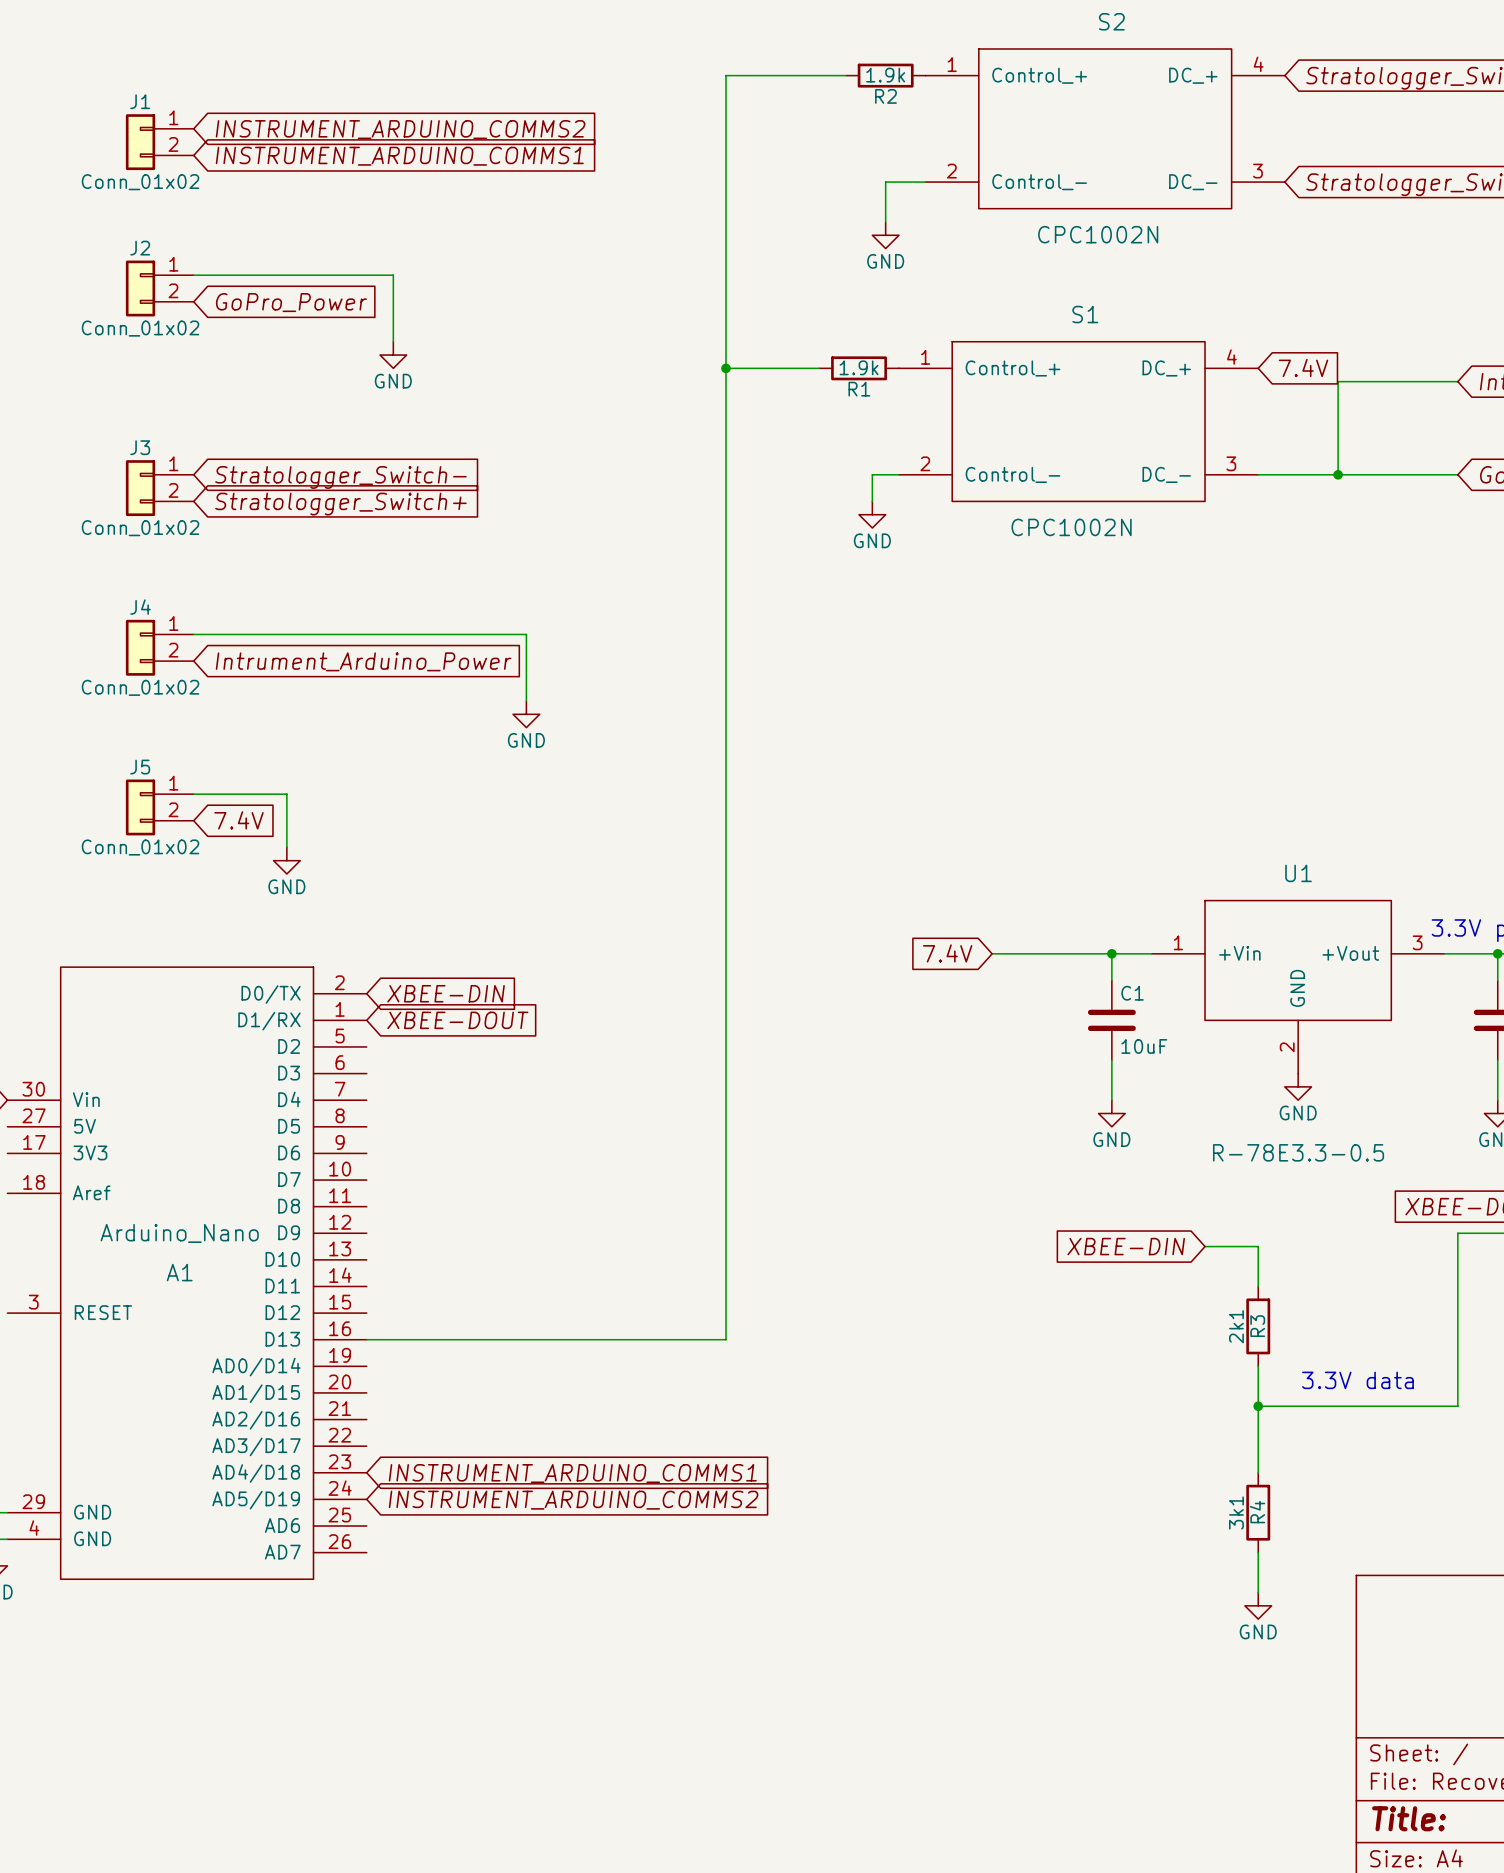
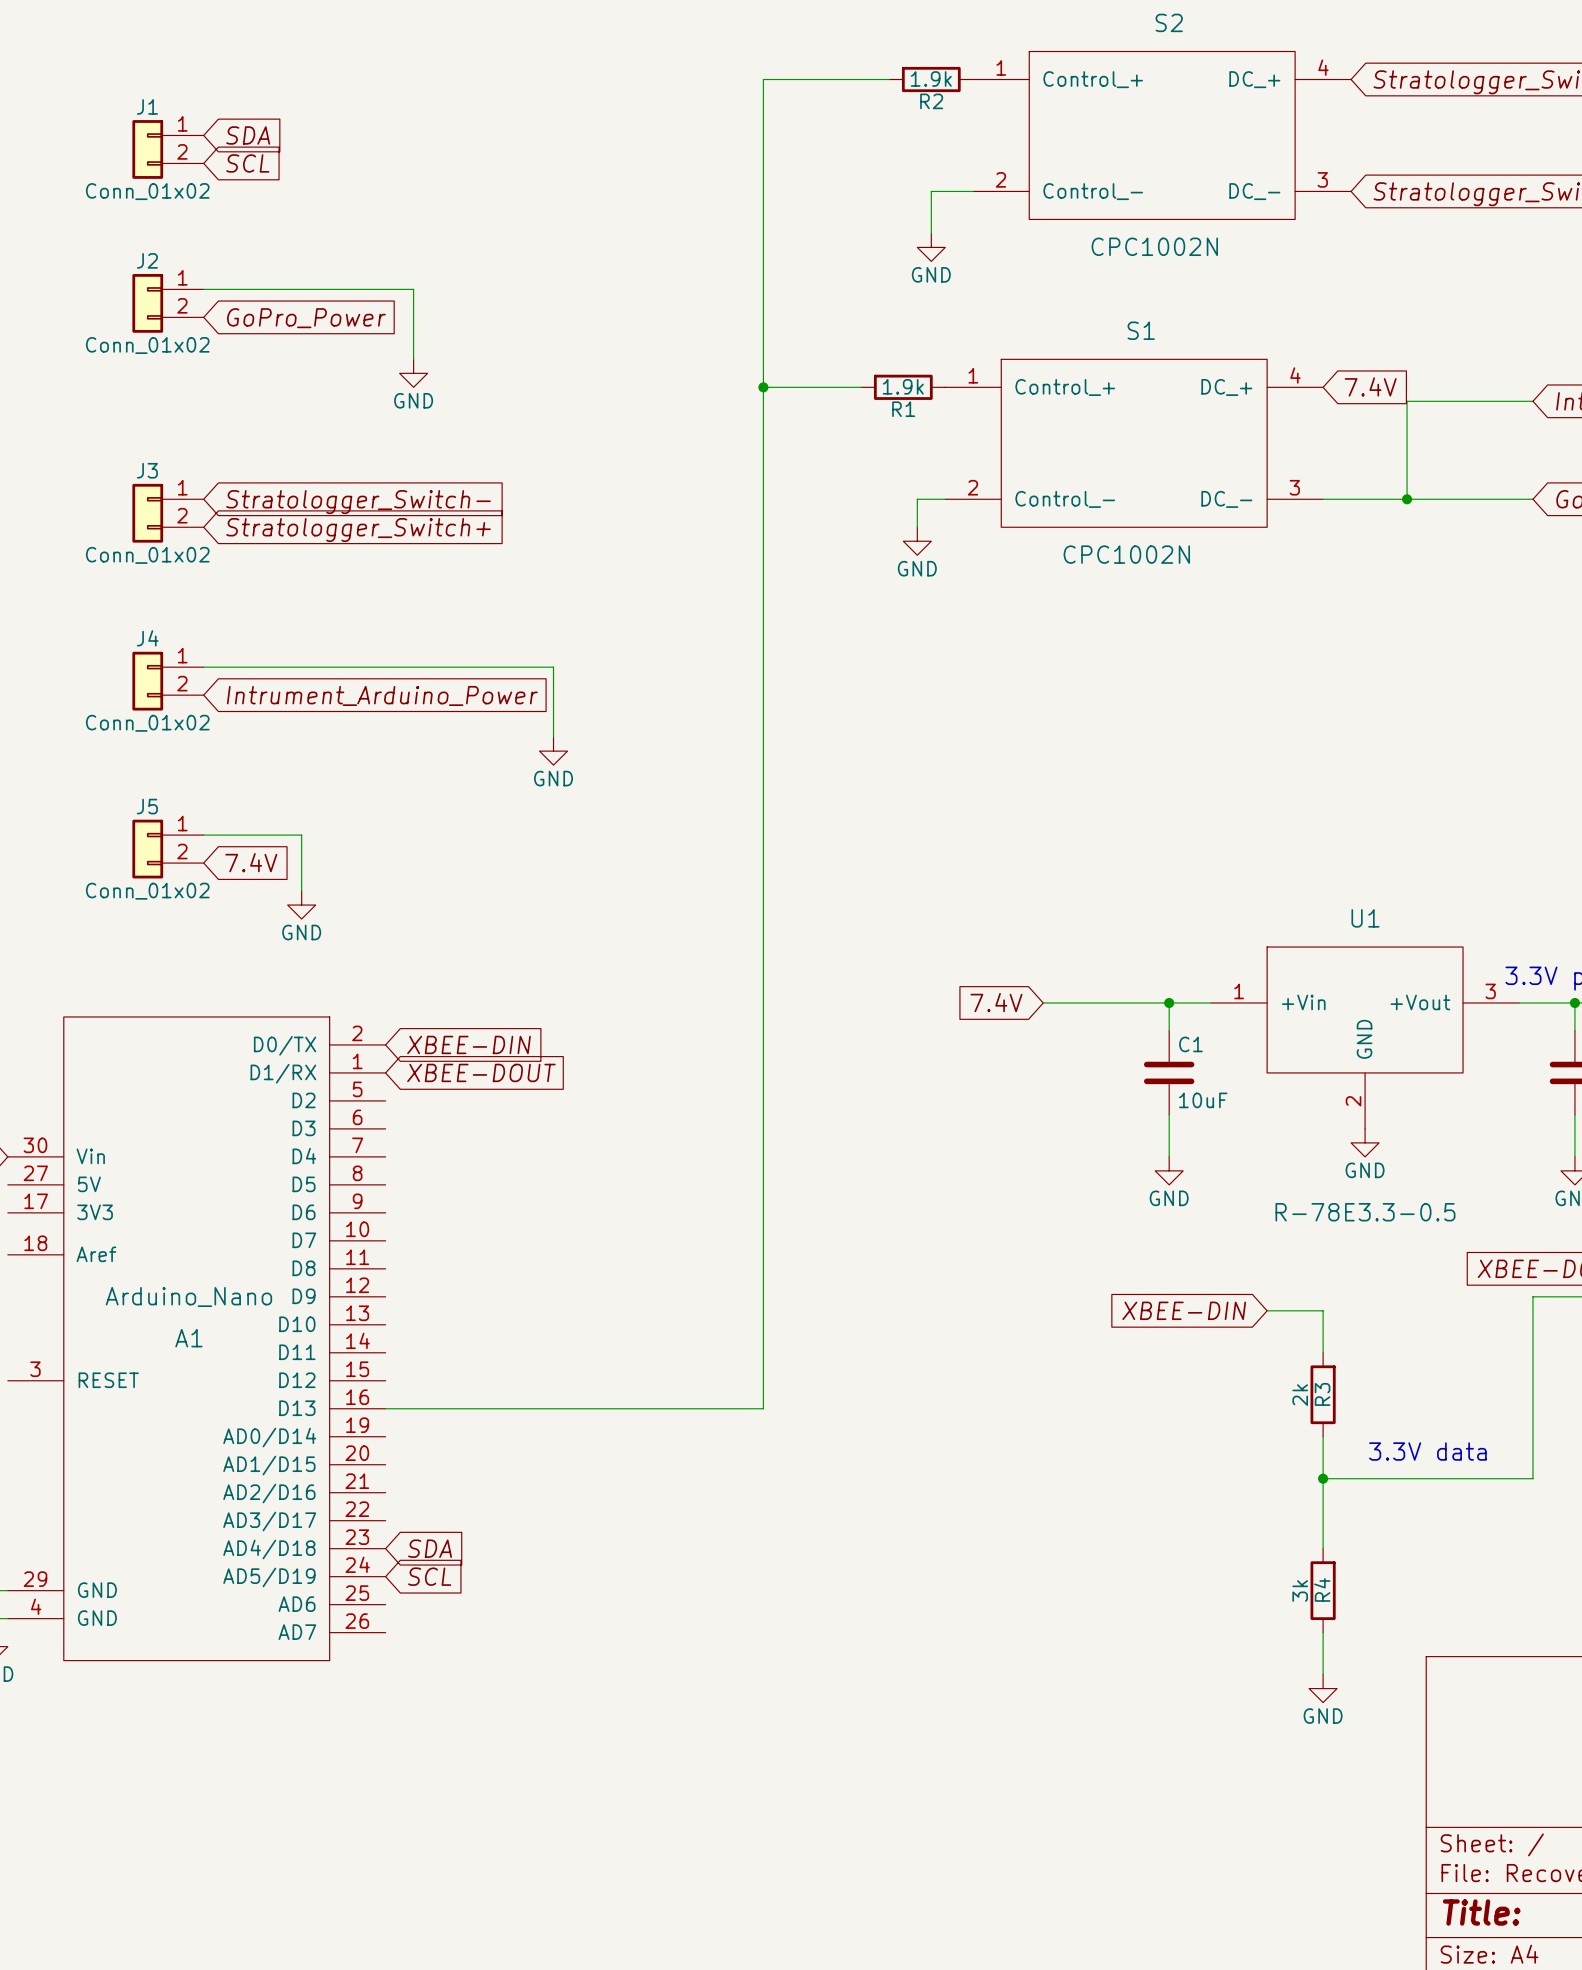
global label: INSTRUMENT_ARDUINO_COMMS2 (400, 129) -> SDA (248, 135)
global label: INSTRUMENT_ARDUINO_COMMS1 (399, 156) -> SCL (247, 163)
2k1 name: 2k1 (1236, 1326) -> 2k (1300, 1395)
global label: INSTRUMENT_ARDUINO_COMMS1 (572, 1473) -> SDA (430, 1548)
global label: INSTRUMENT_ARDUINO_COMMS2 (573, 1500) -> SCL (429, 1576)
3k1 name: 3k1 (1236, 1513) -> 3k (1300, 1590)

